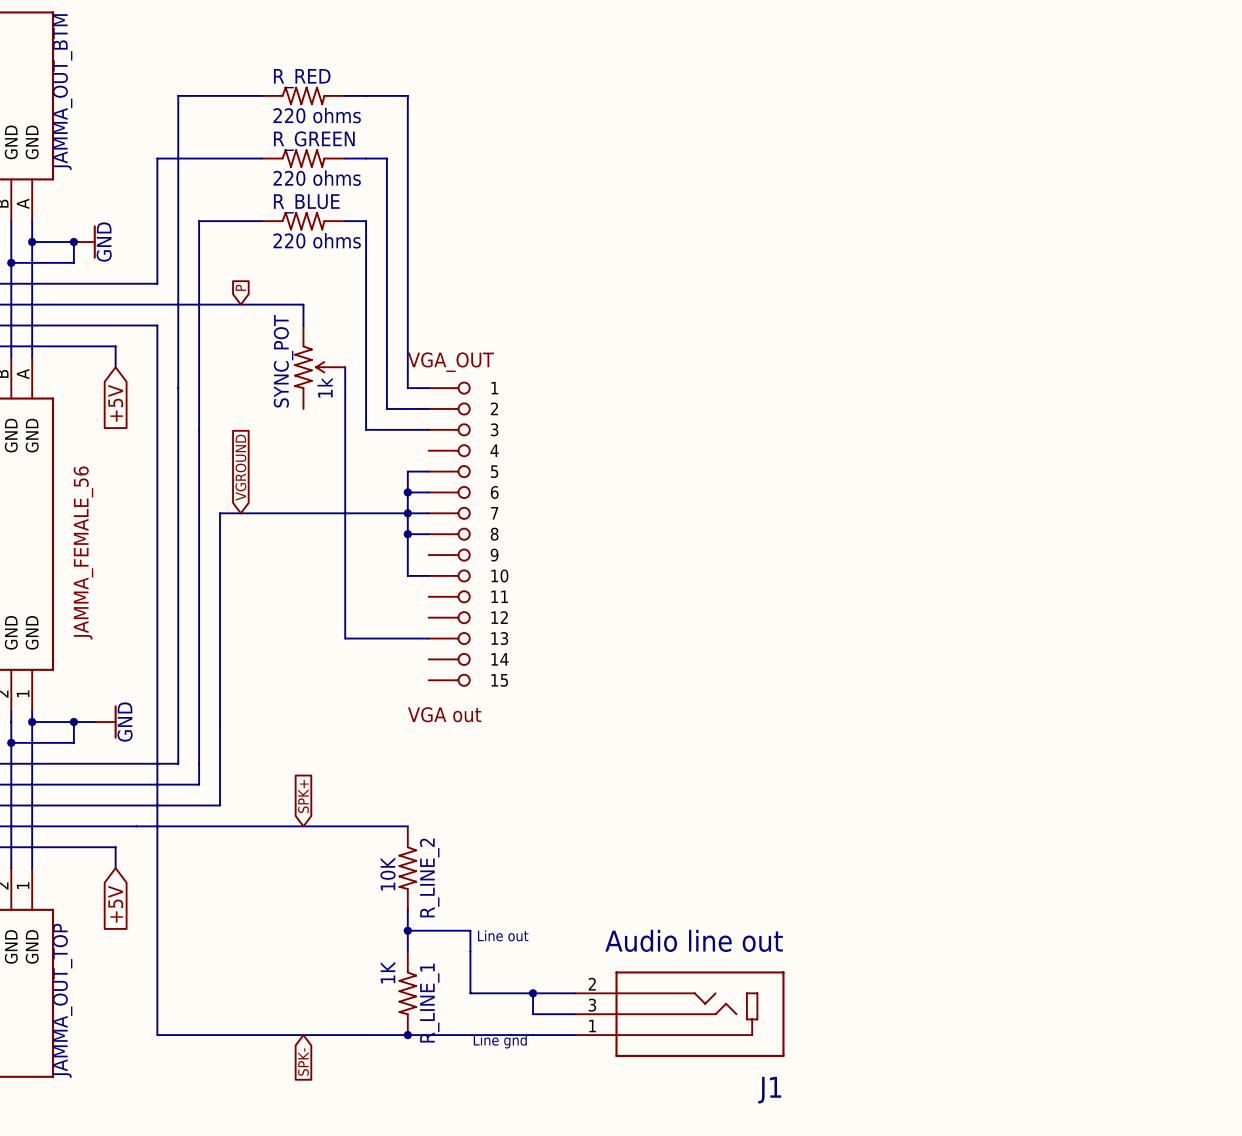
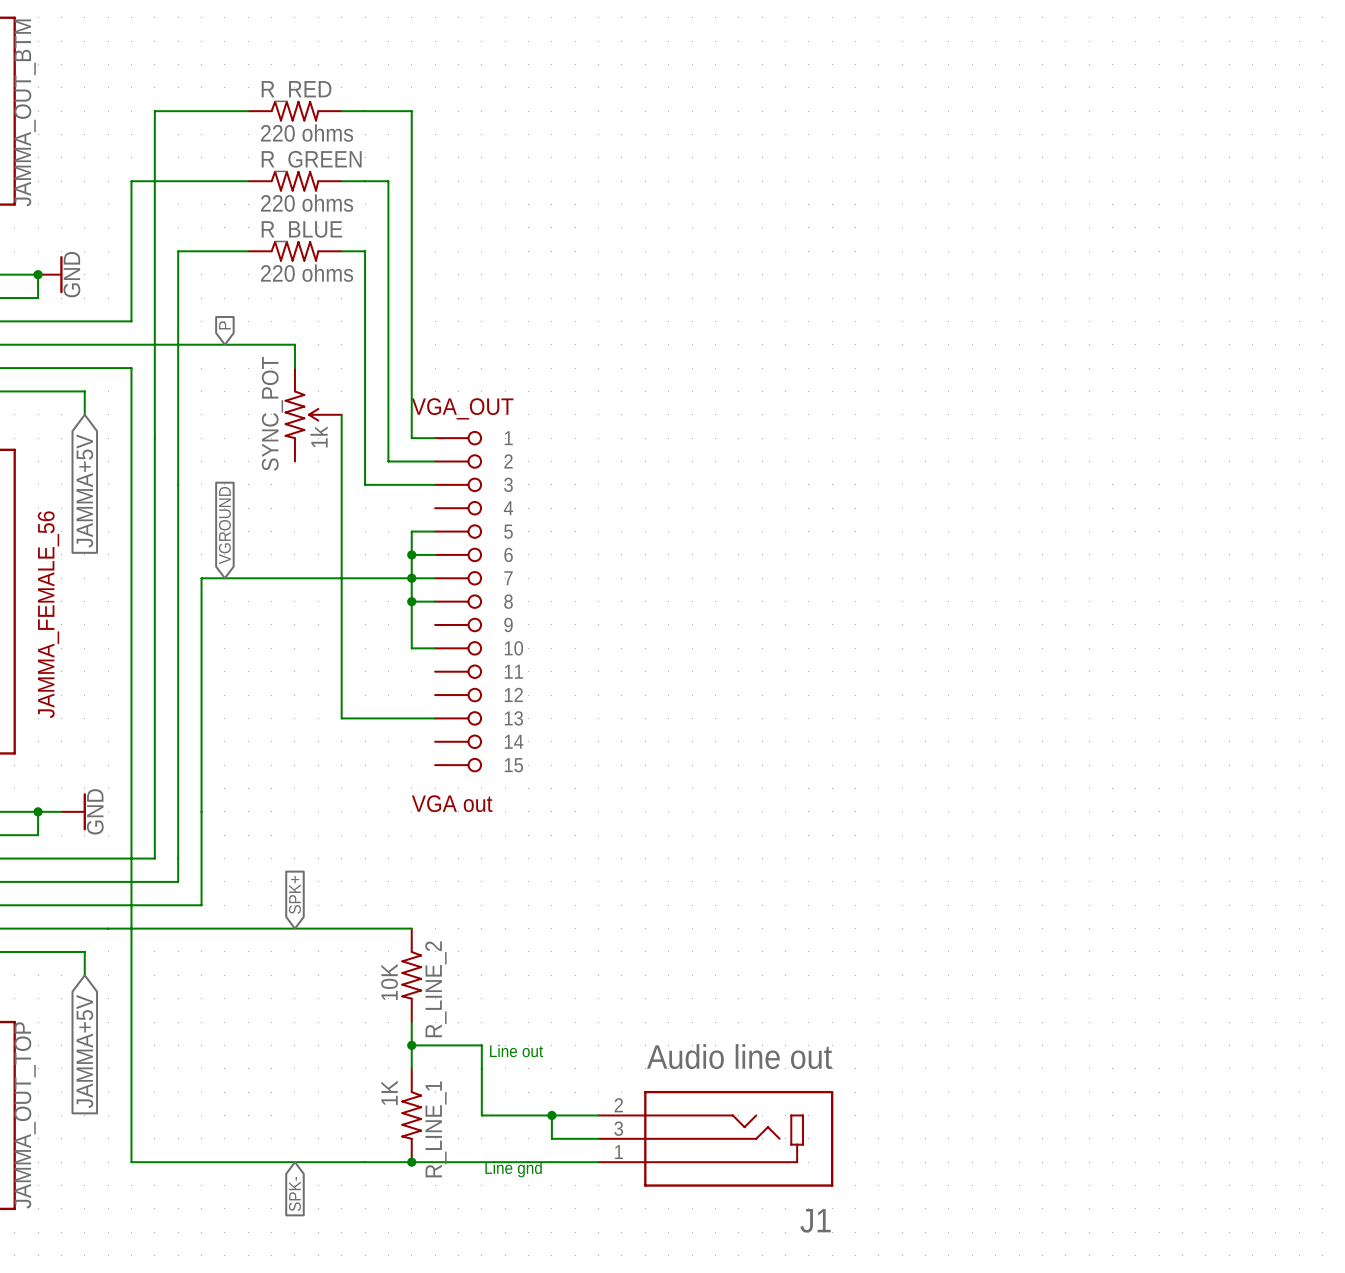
global label: +5V (115, 403) -> JAMMA+5V (84, 491)
global label: +5V (115, 904) -> JAMMA+5V (84, 1051)

